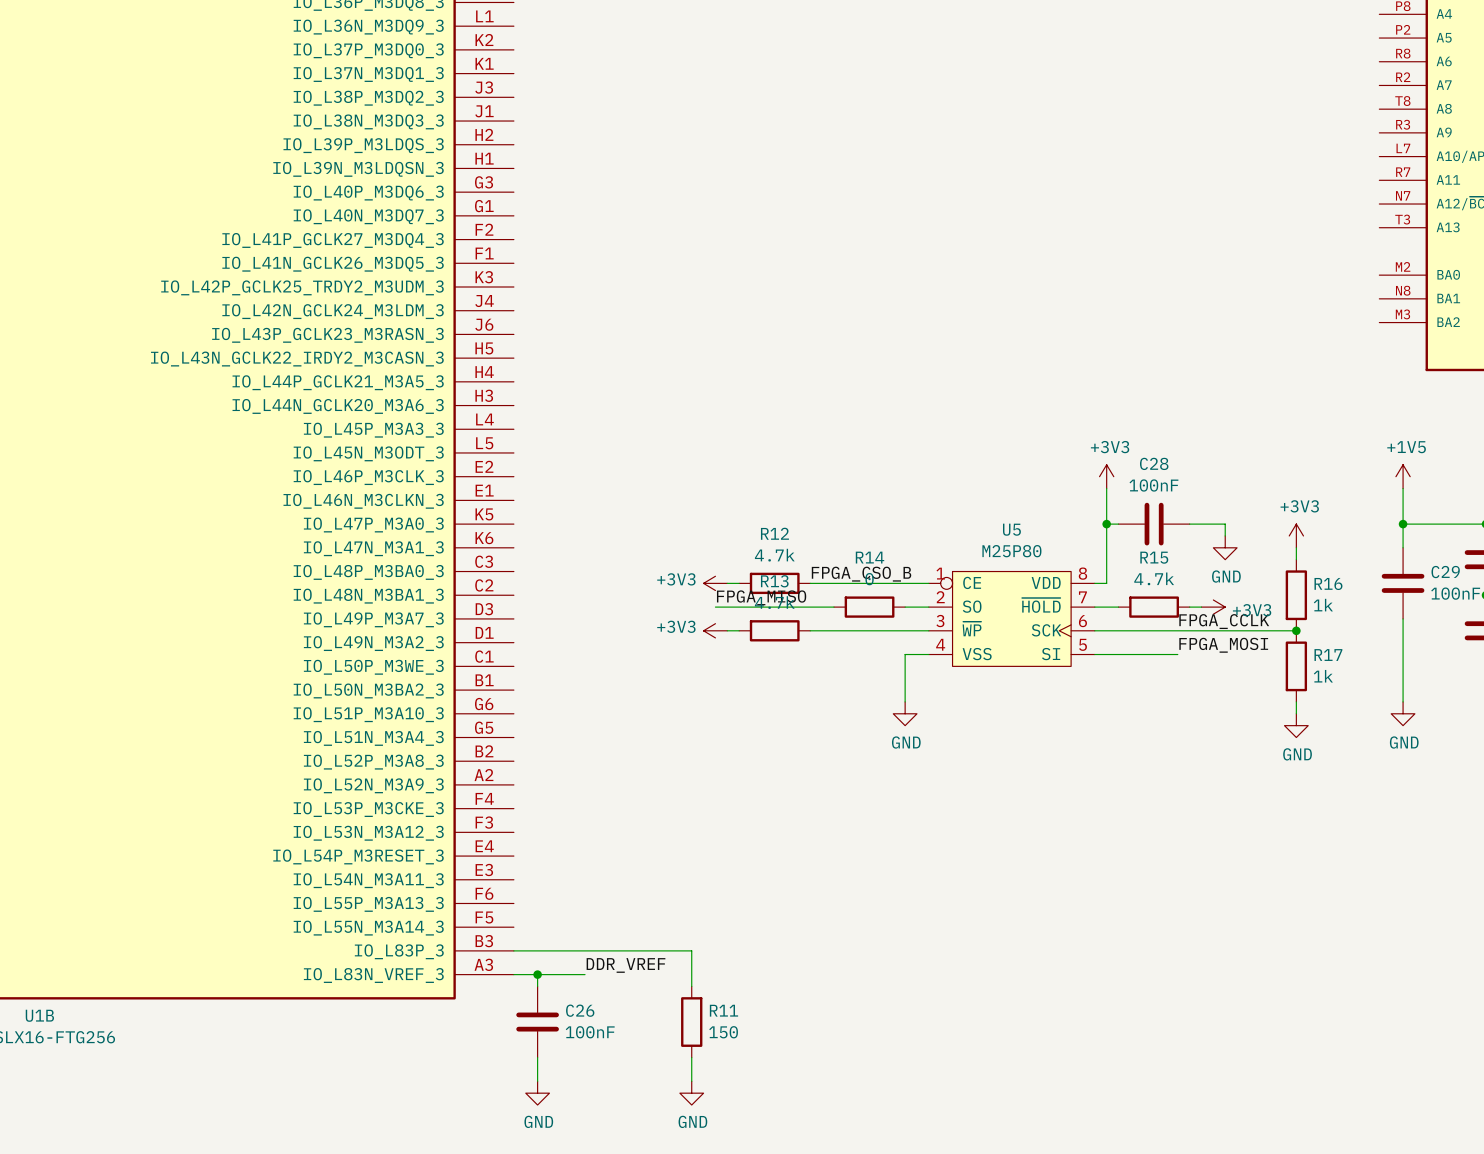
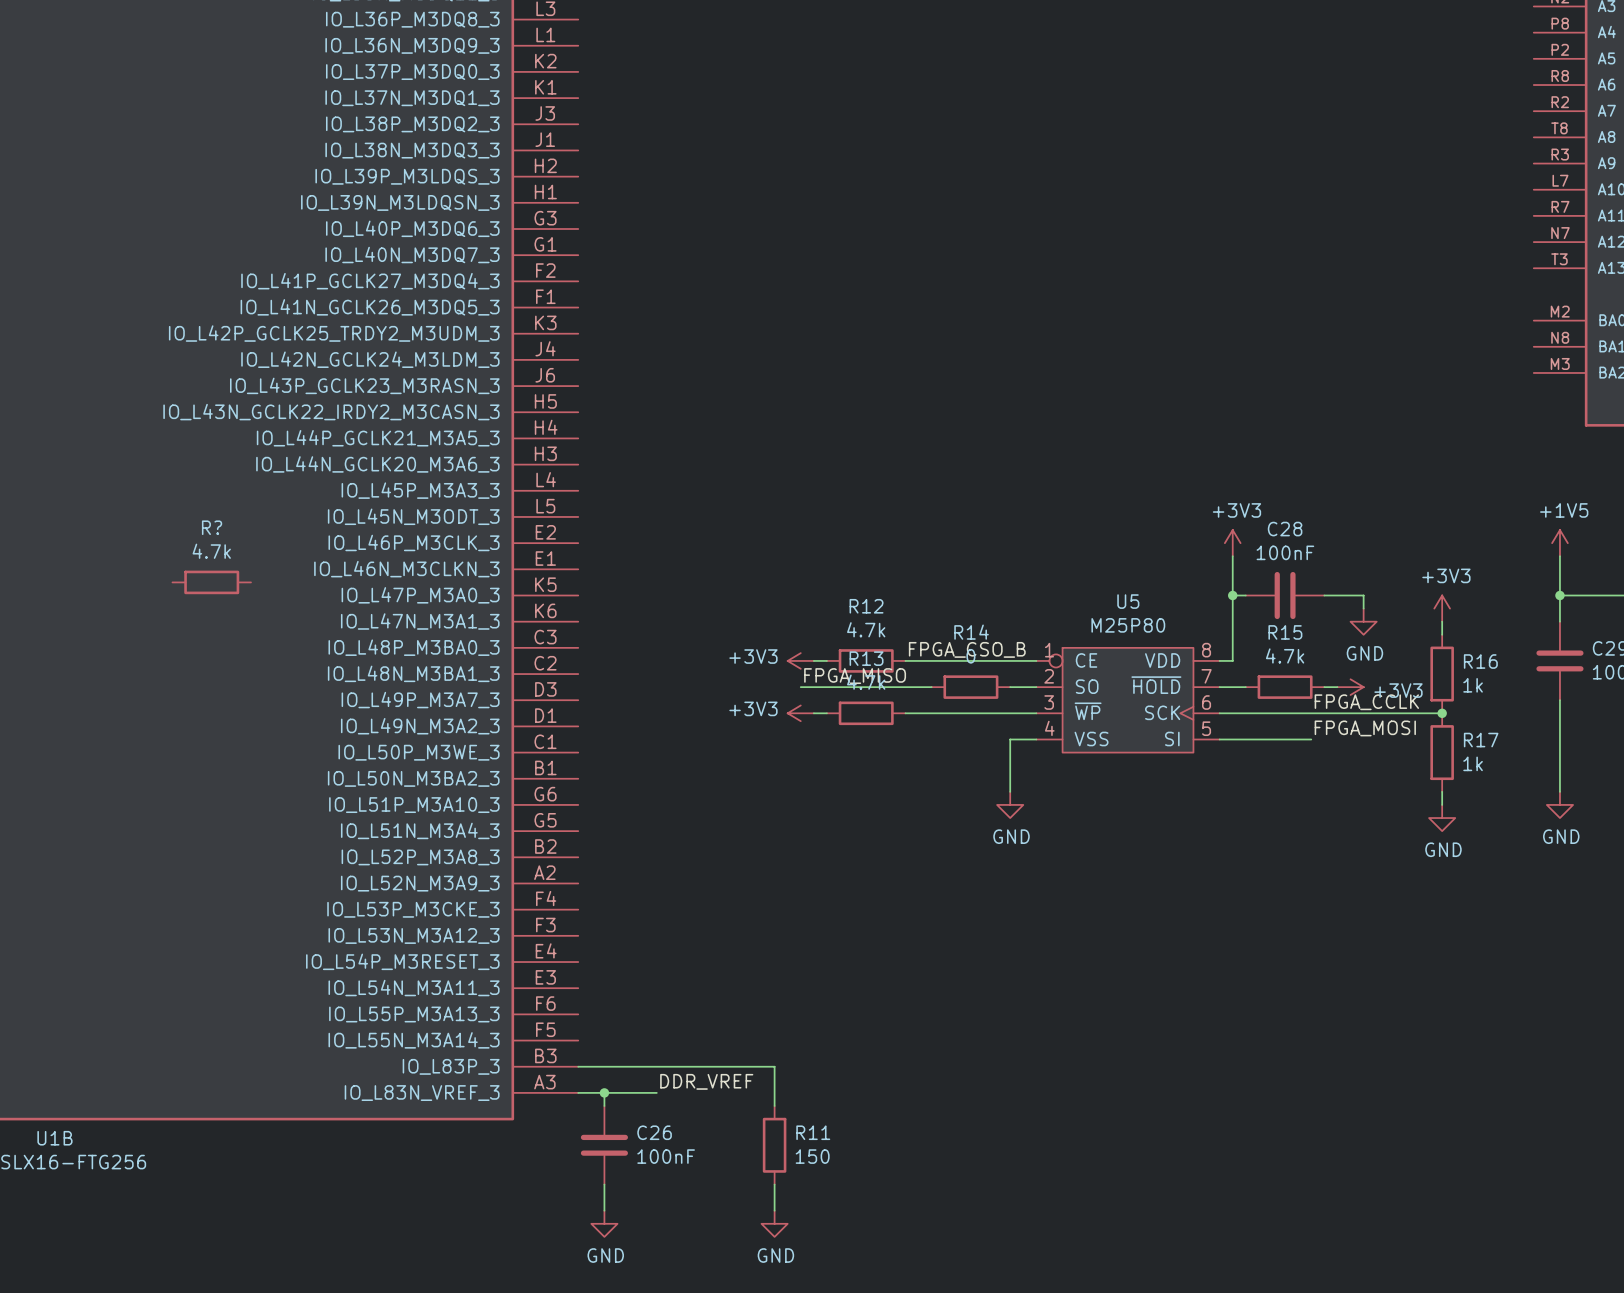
R?: none -> 4.7k (211, 582)

